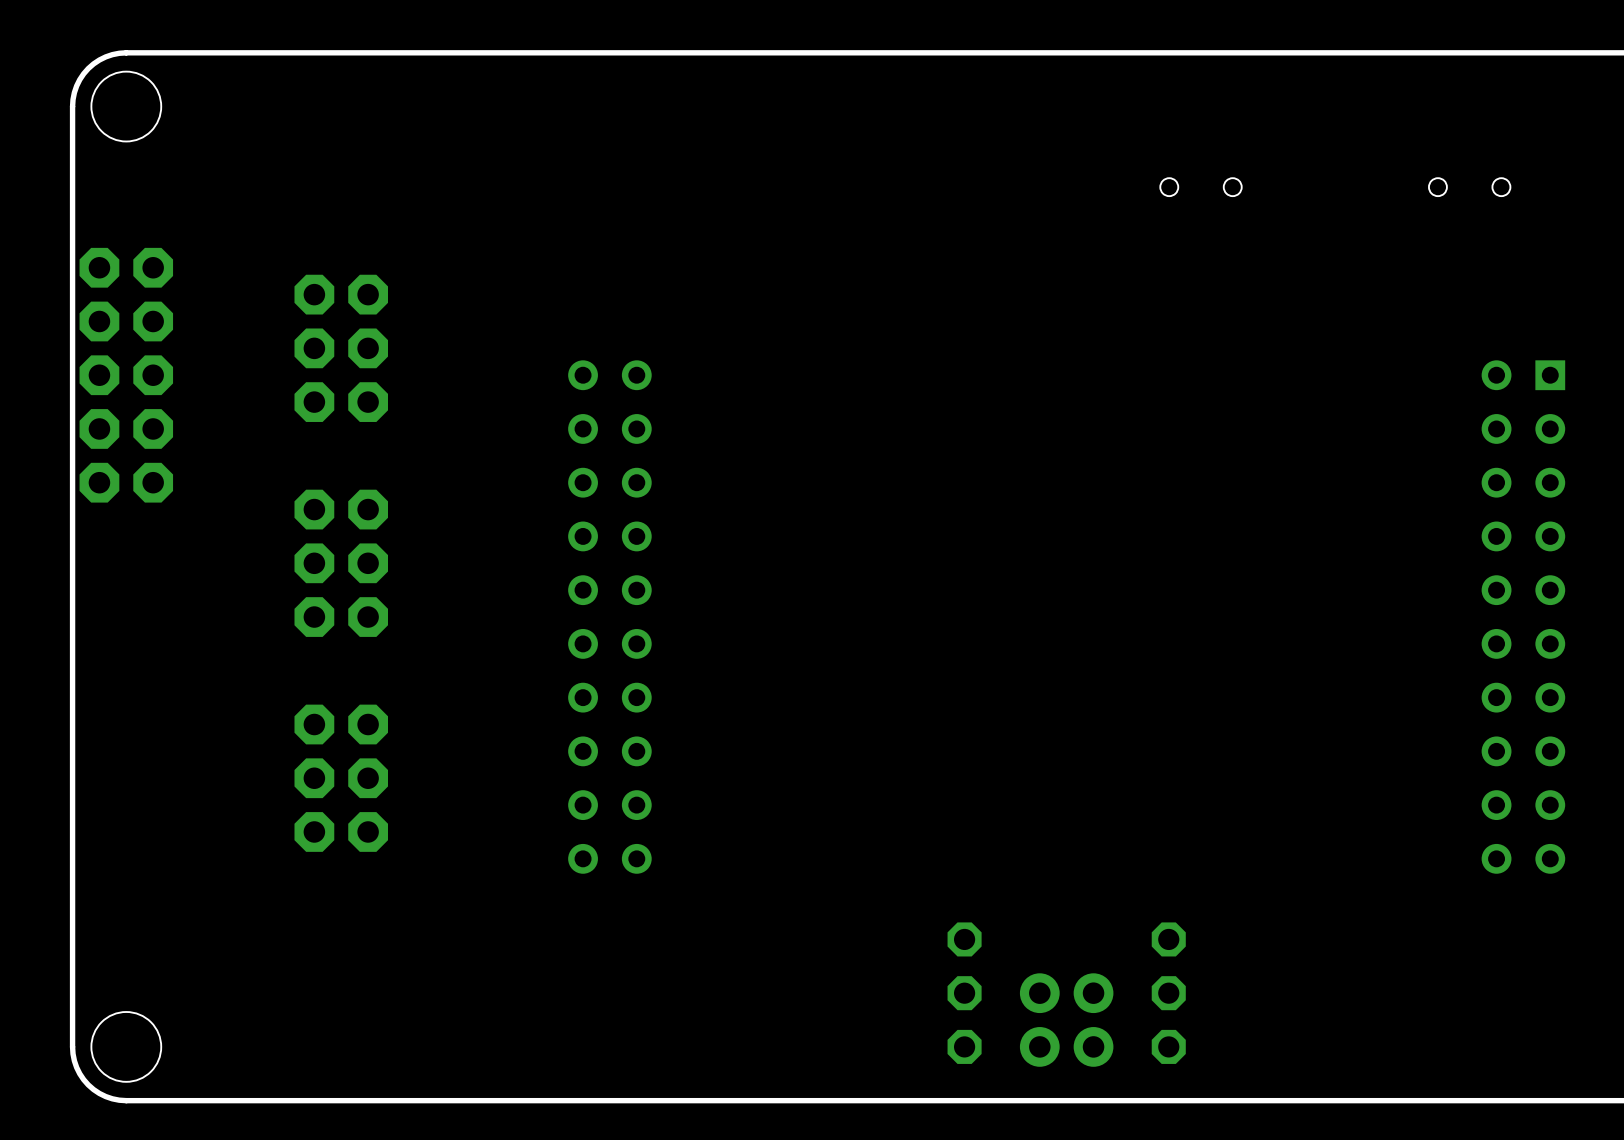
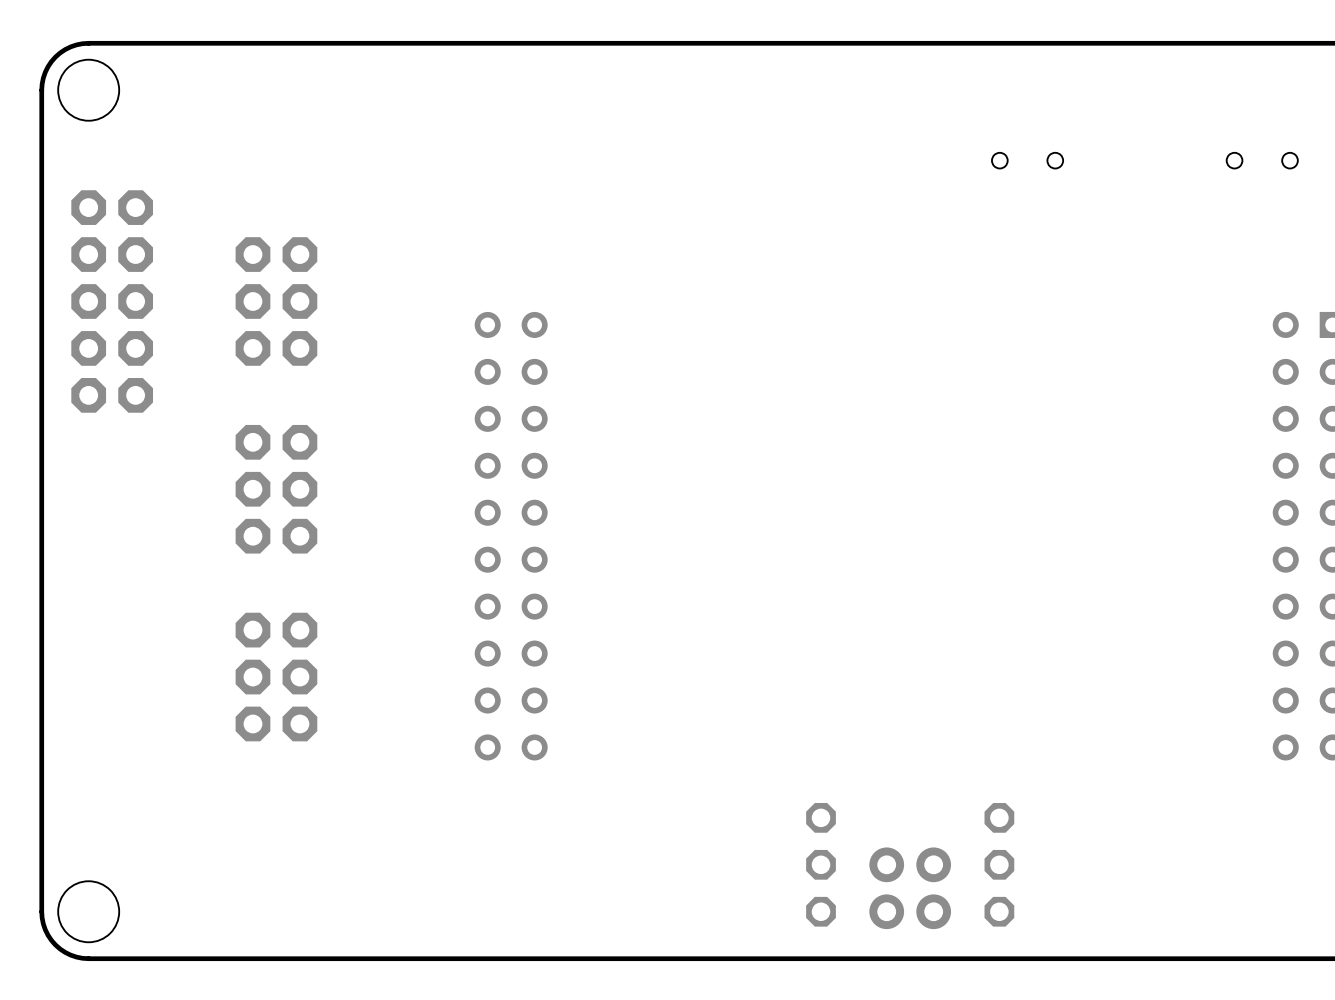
part position: (126, 375) -> (112, 301)

